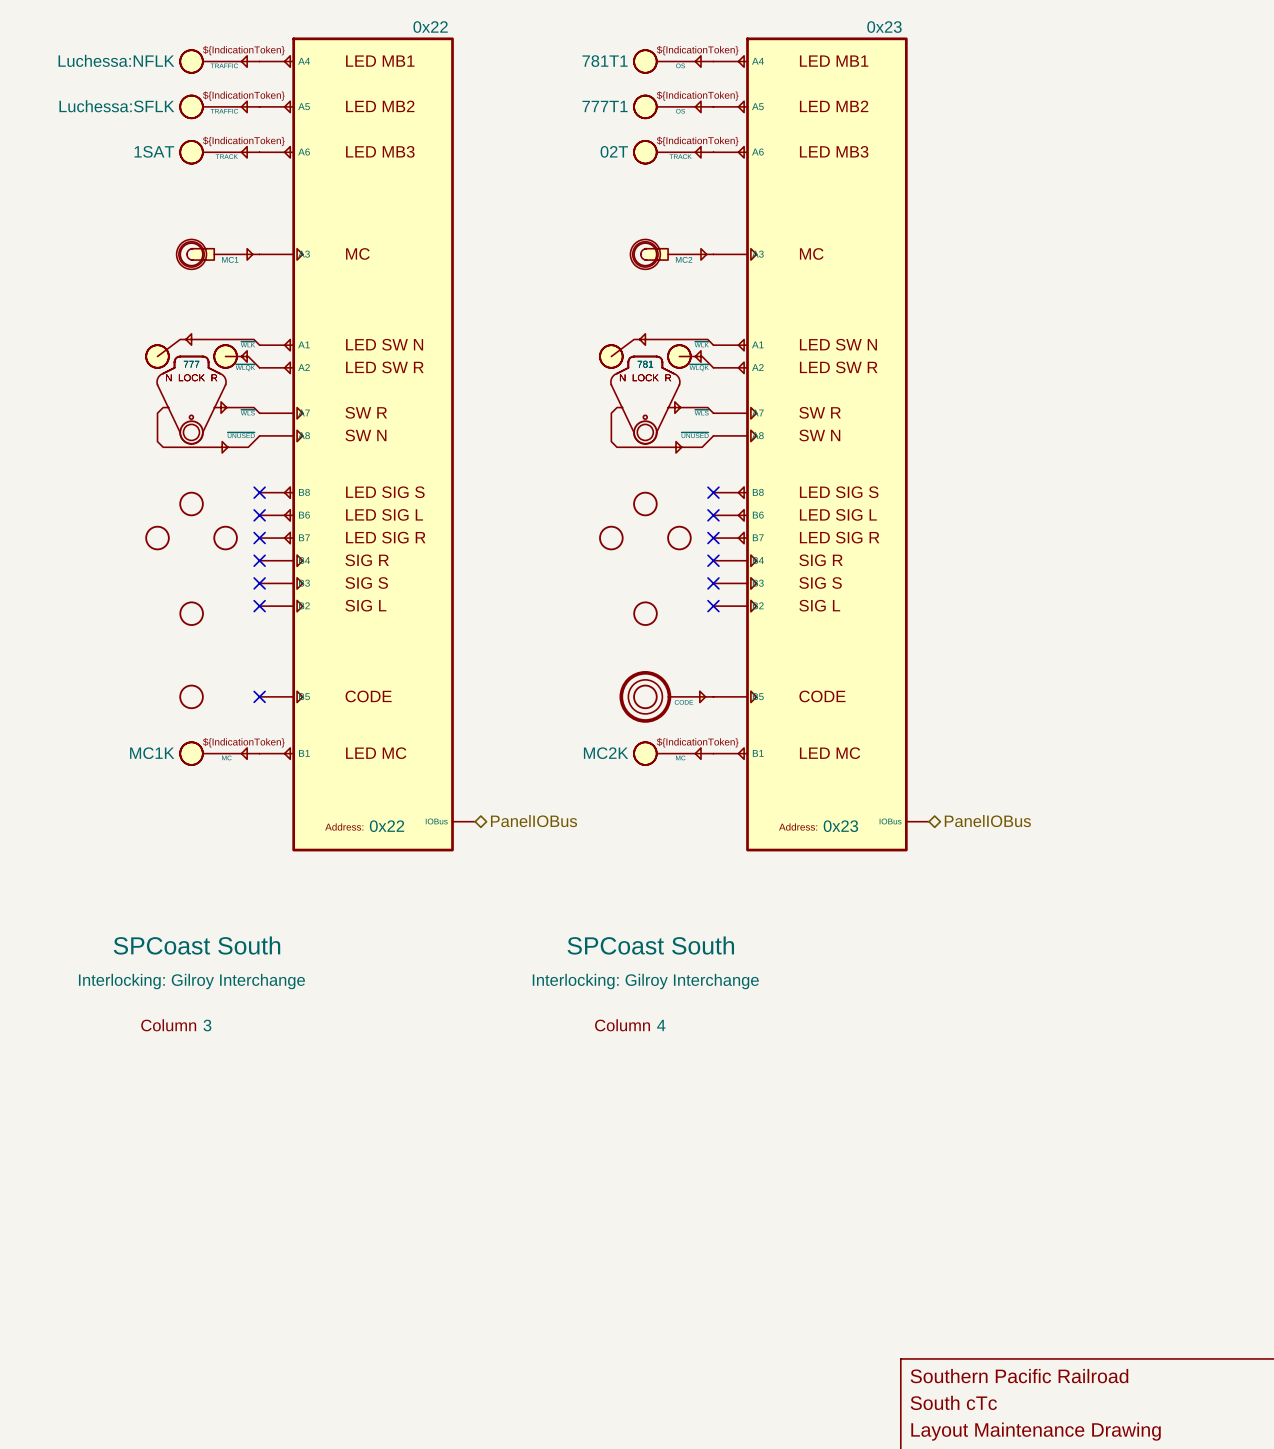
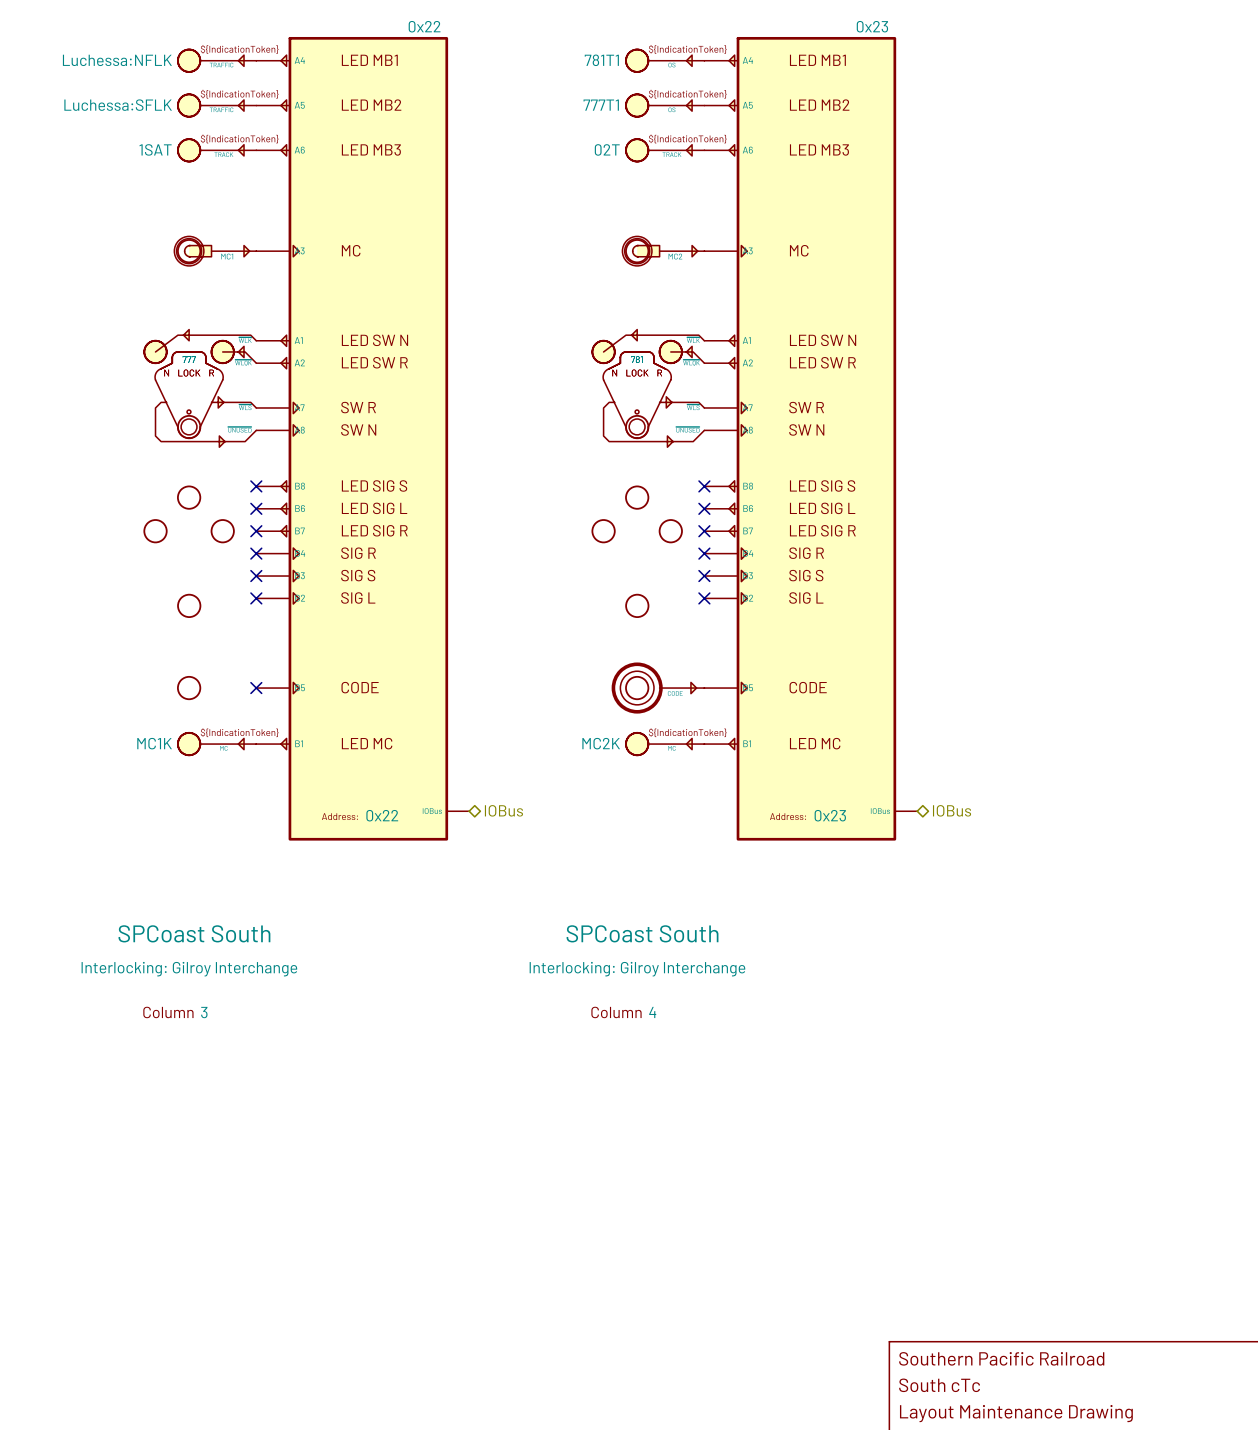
hierarchical label: PanelIOBus (533, 821) -> IOBus (503, 810)
hierarchical label: PanelIOBus (987, 821) -> IOBus (952, 810)

